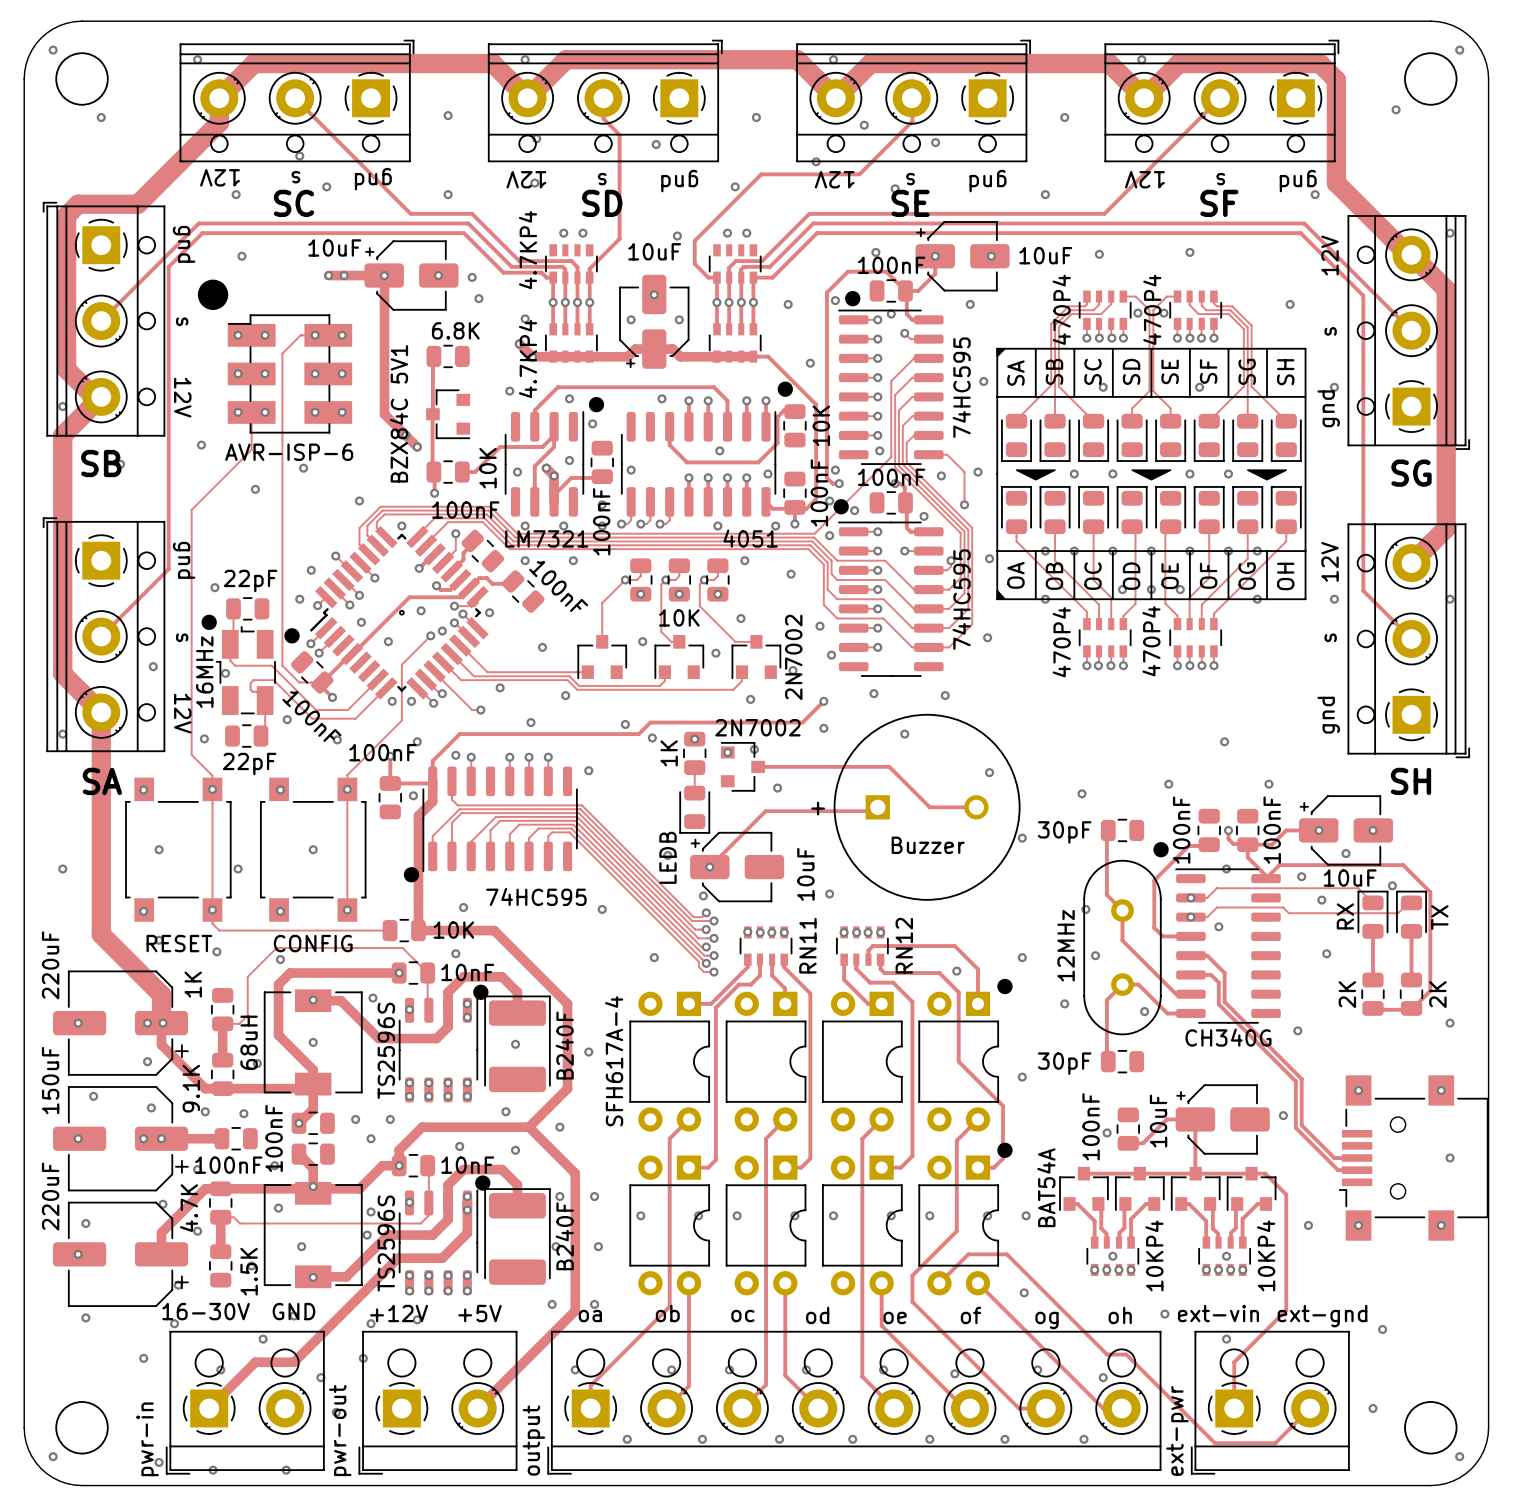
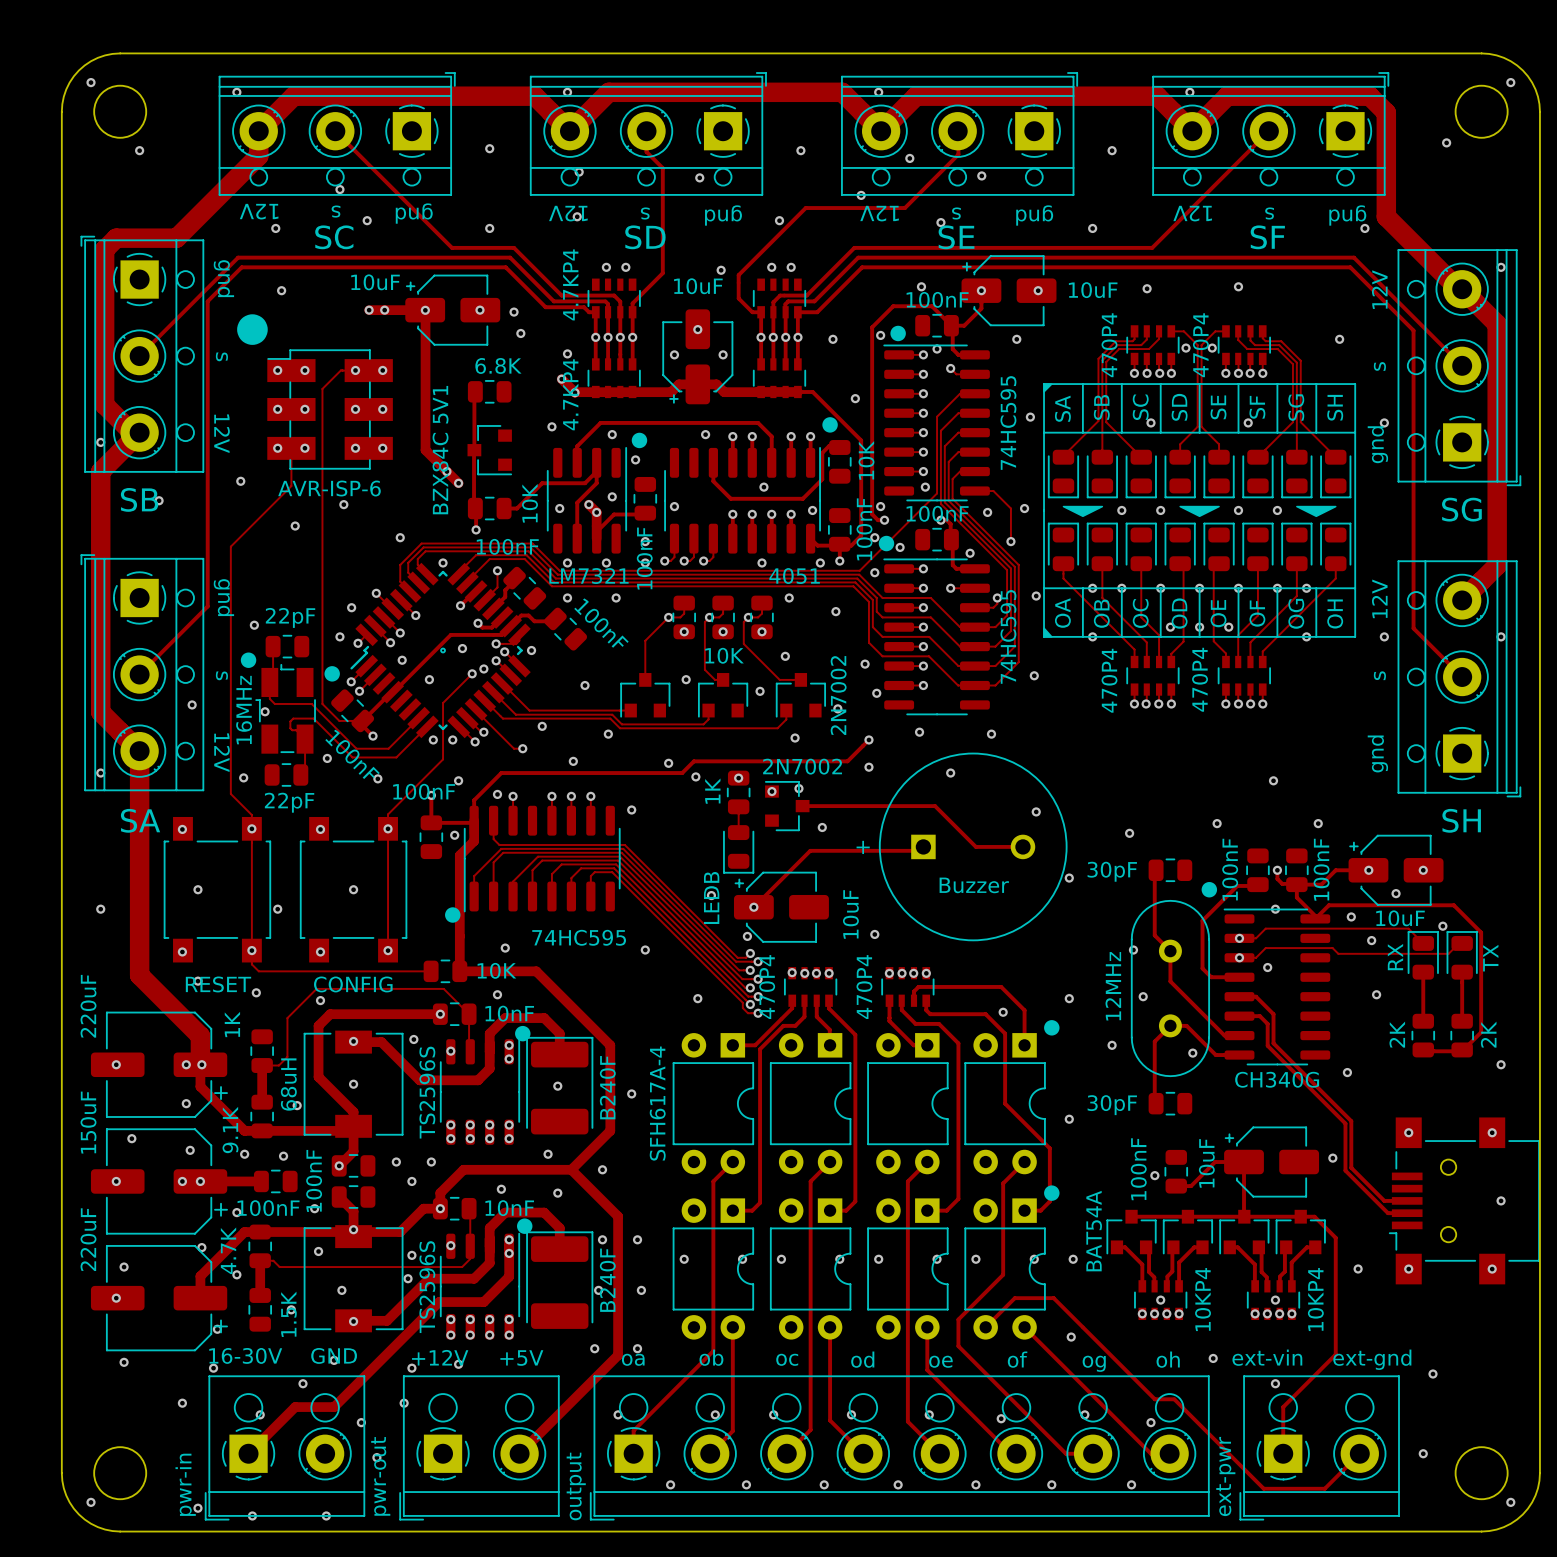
RN11 value: none -> 470P4 (767, 987)
RN11 name: RN11 (807, 945) -> none
RN12 value: none -> 470P4 (864, 987)
RN12 name: RN12 (904, 945) -> none

